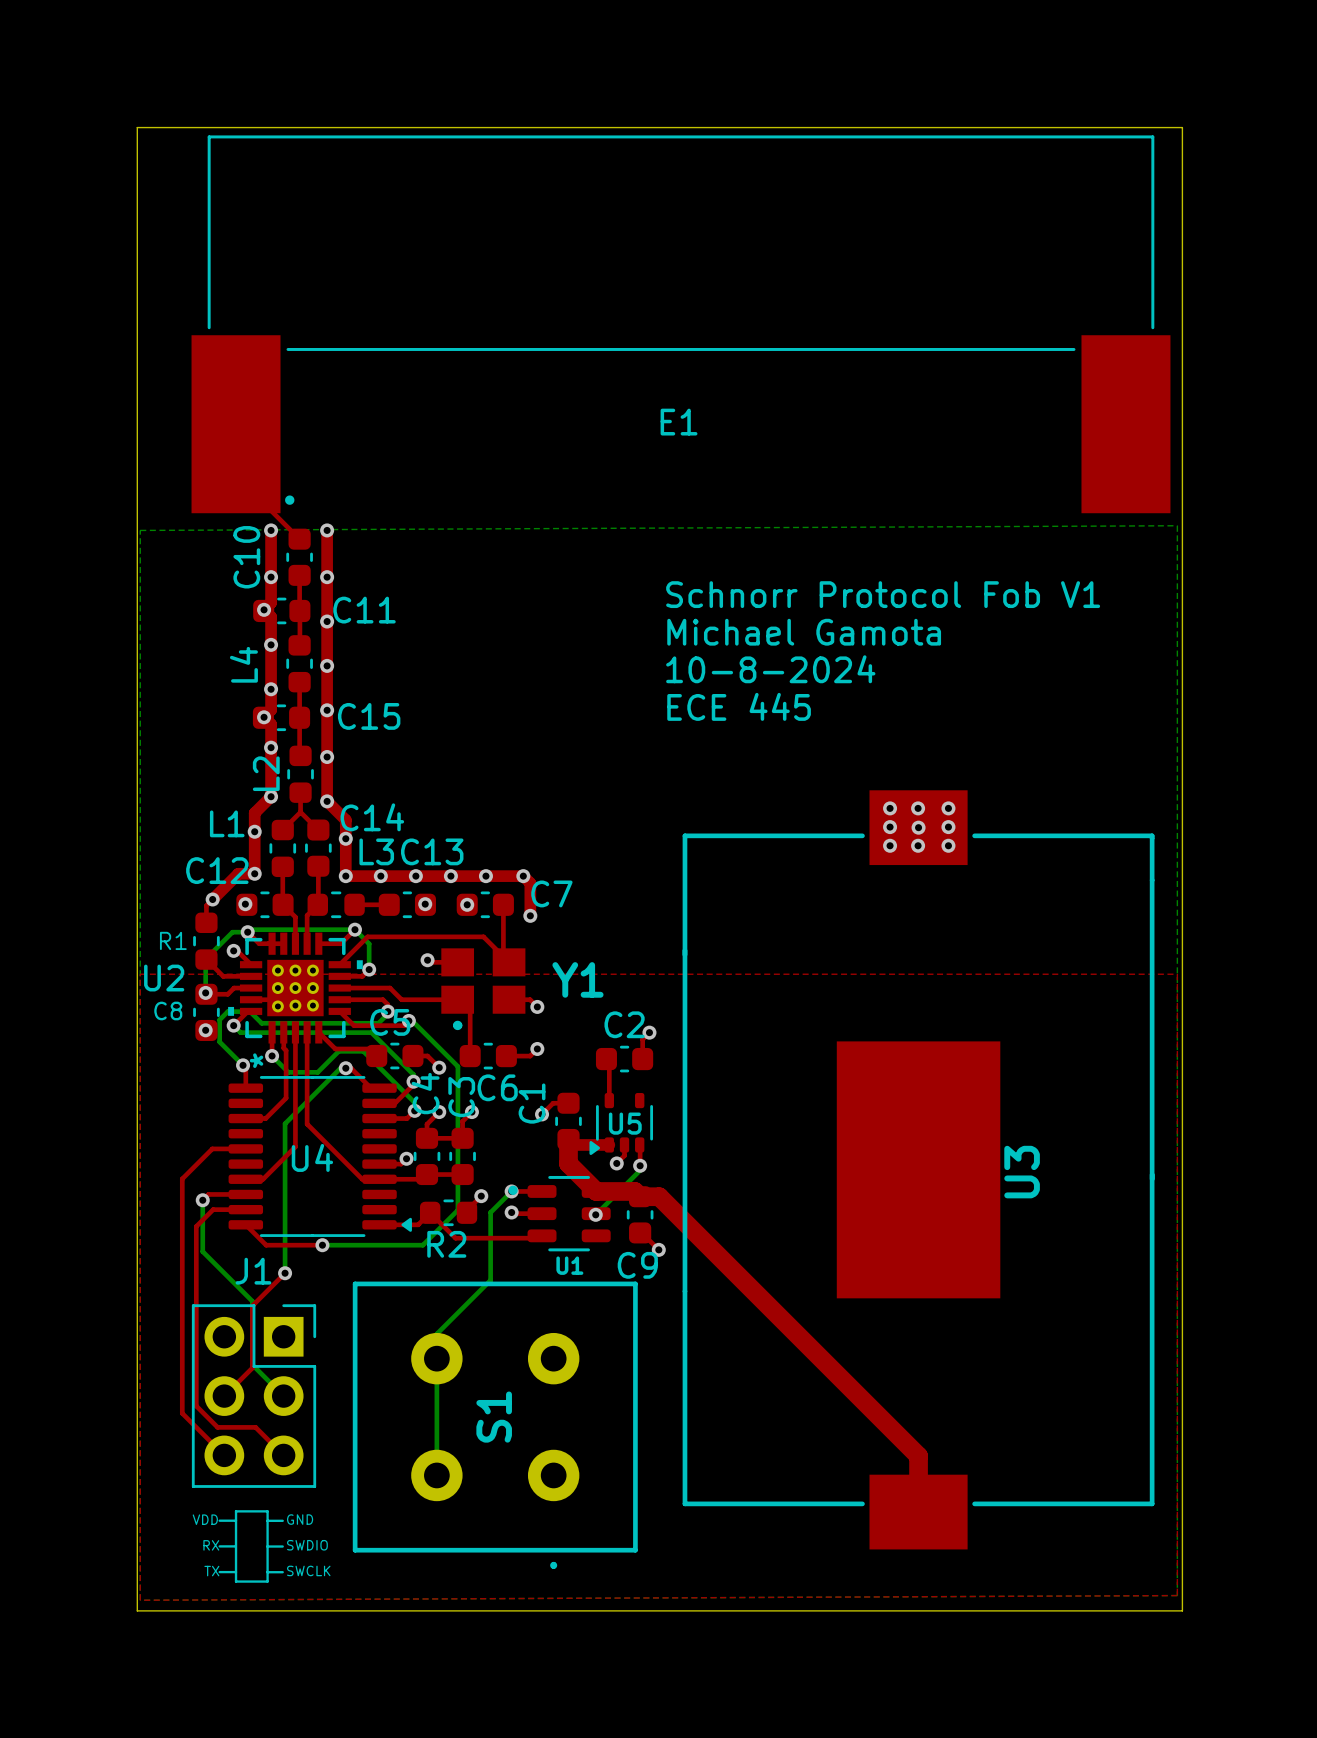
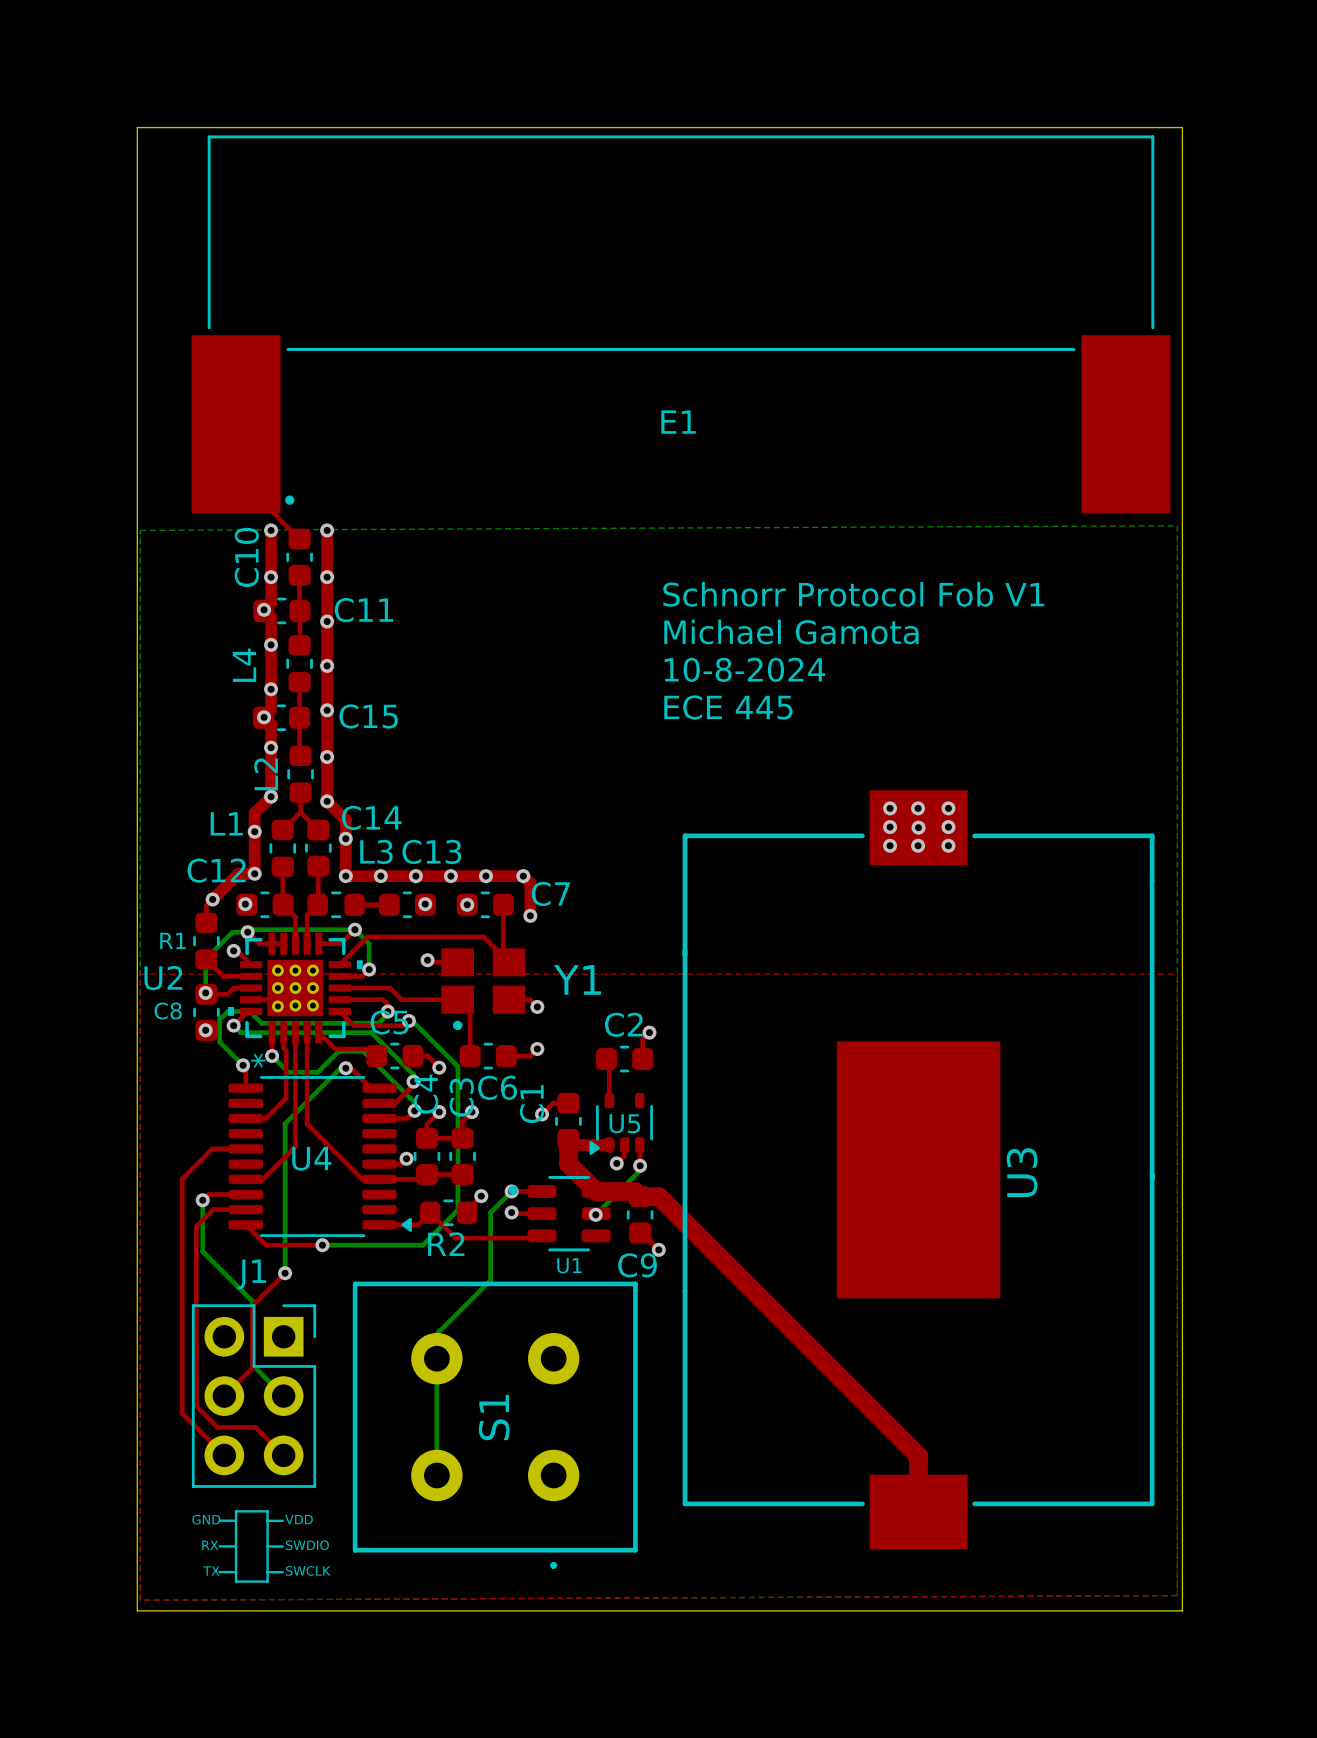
text: VDD (205, 1519) -> GND (206, 1519)
text: GND (300, 1519) -> VDD (299, 1519)

